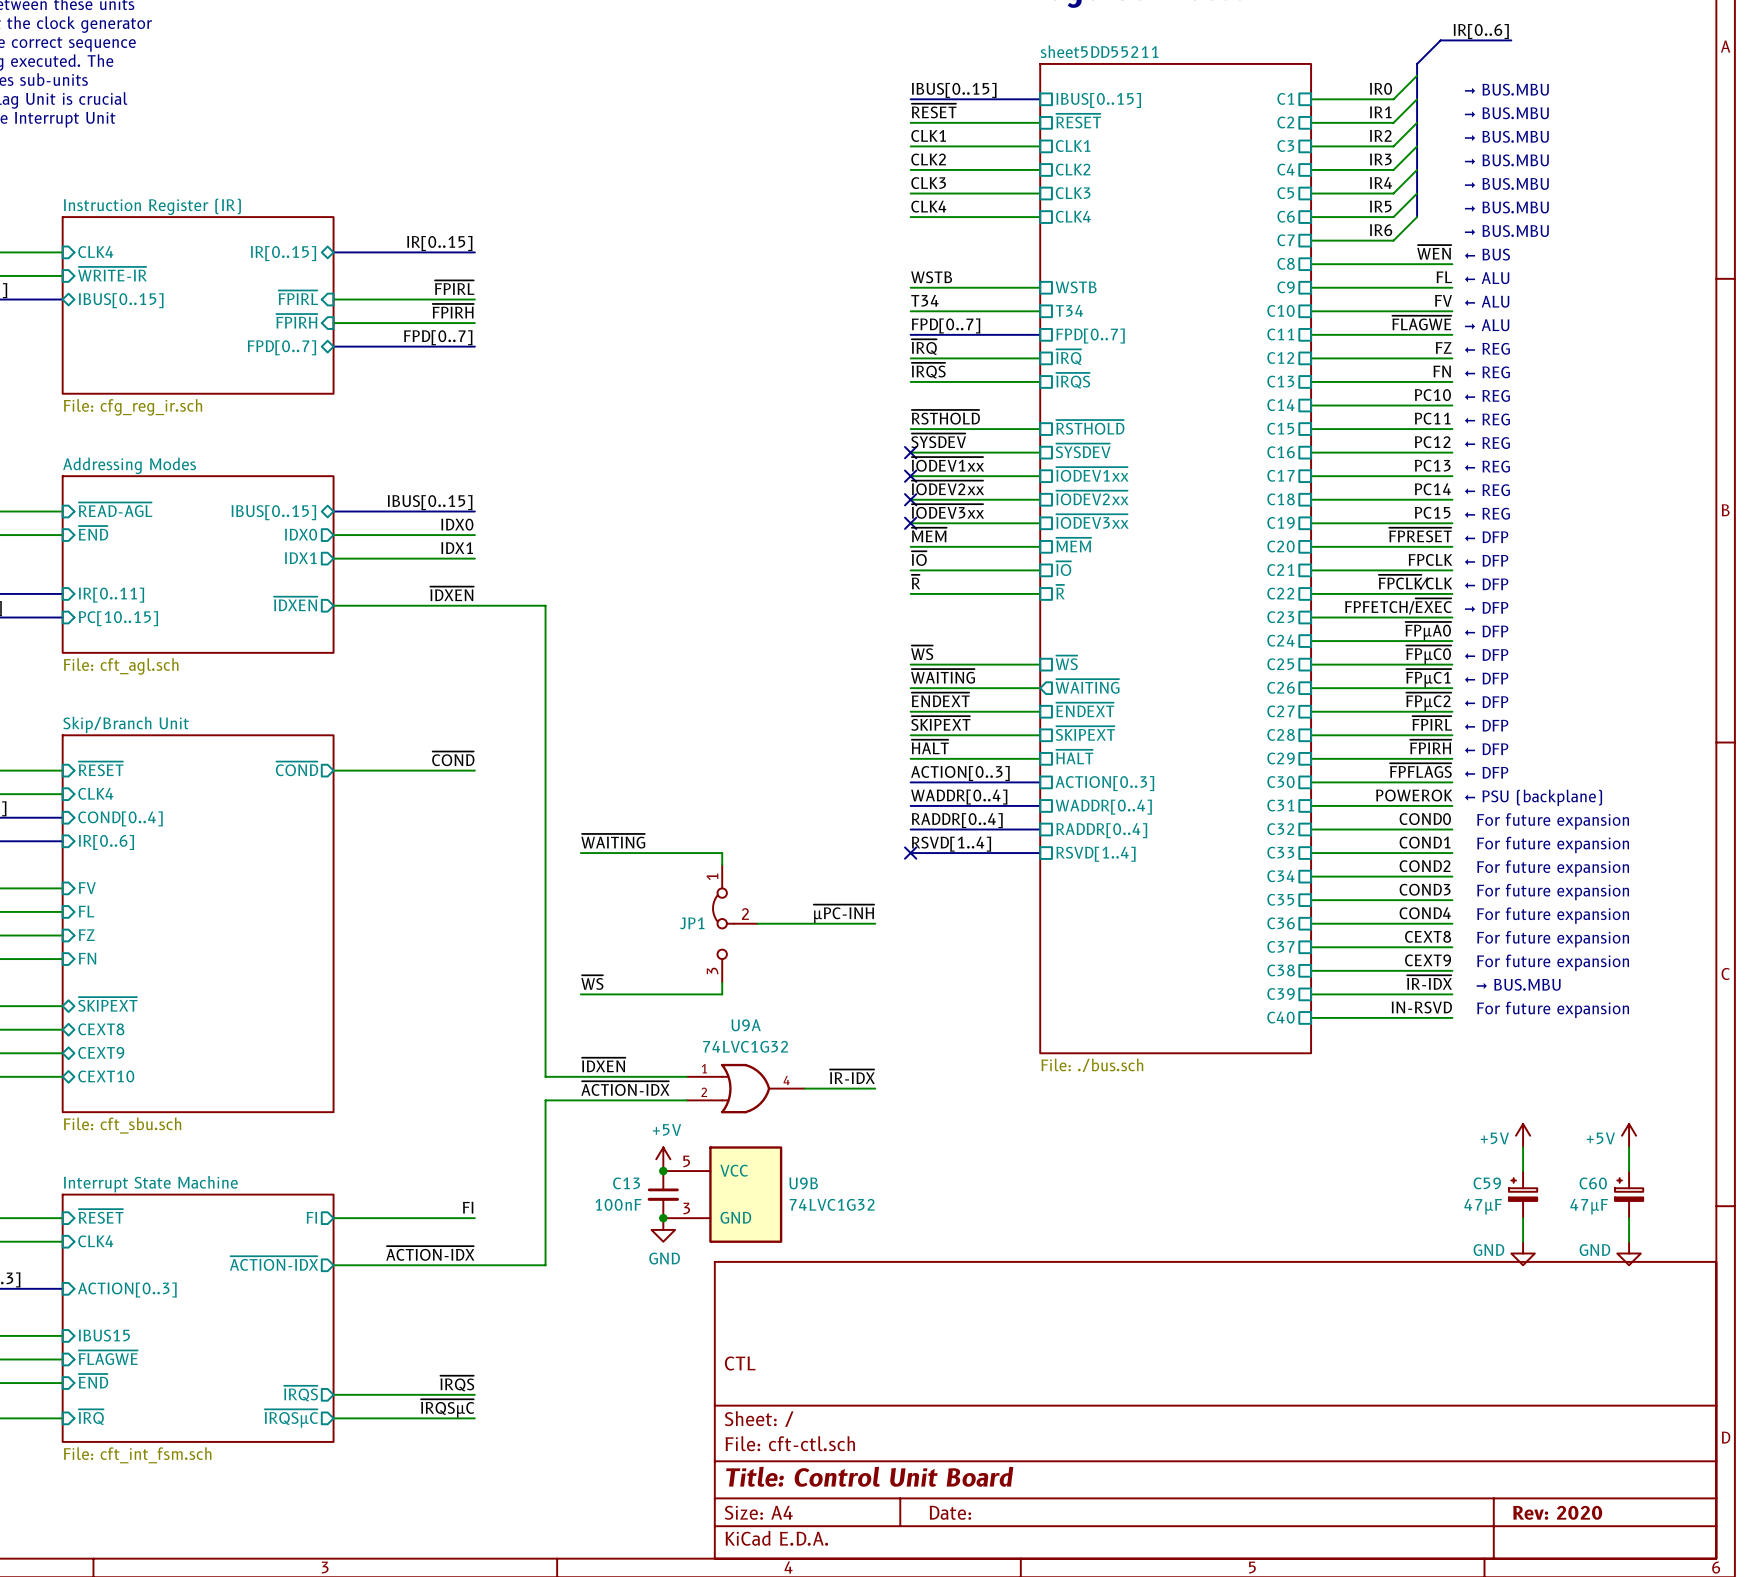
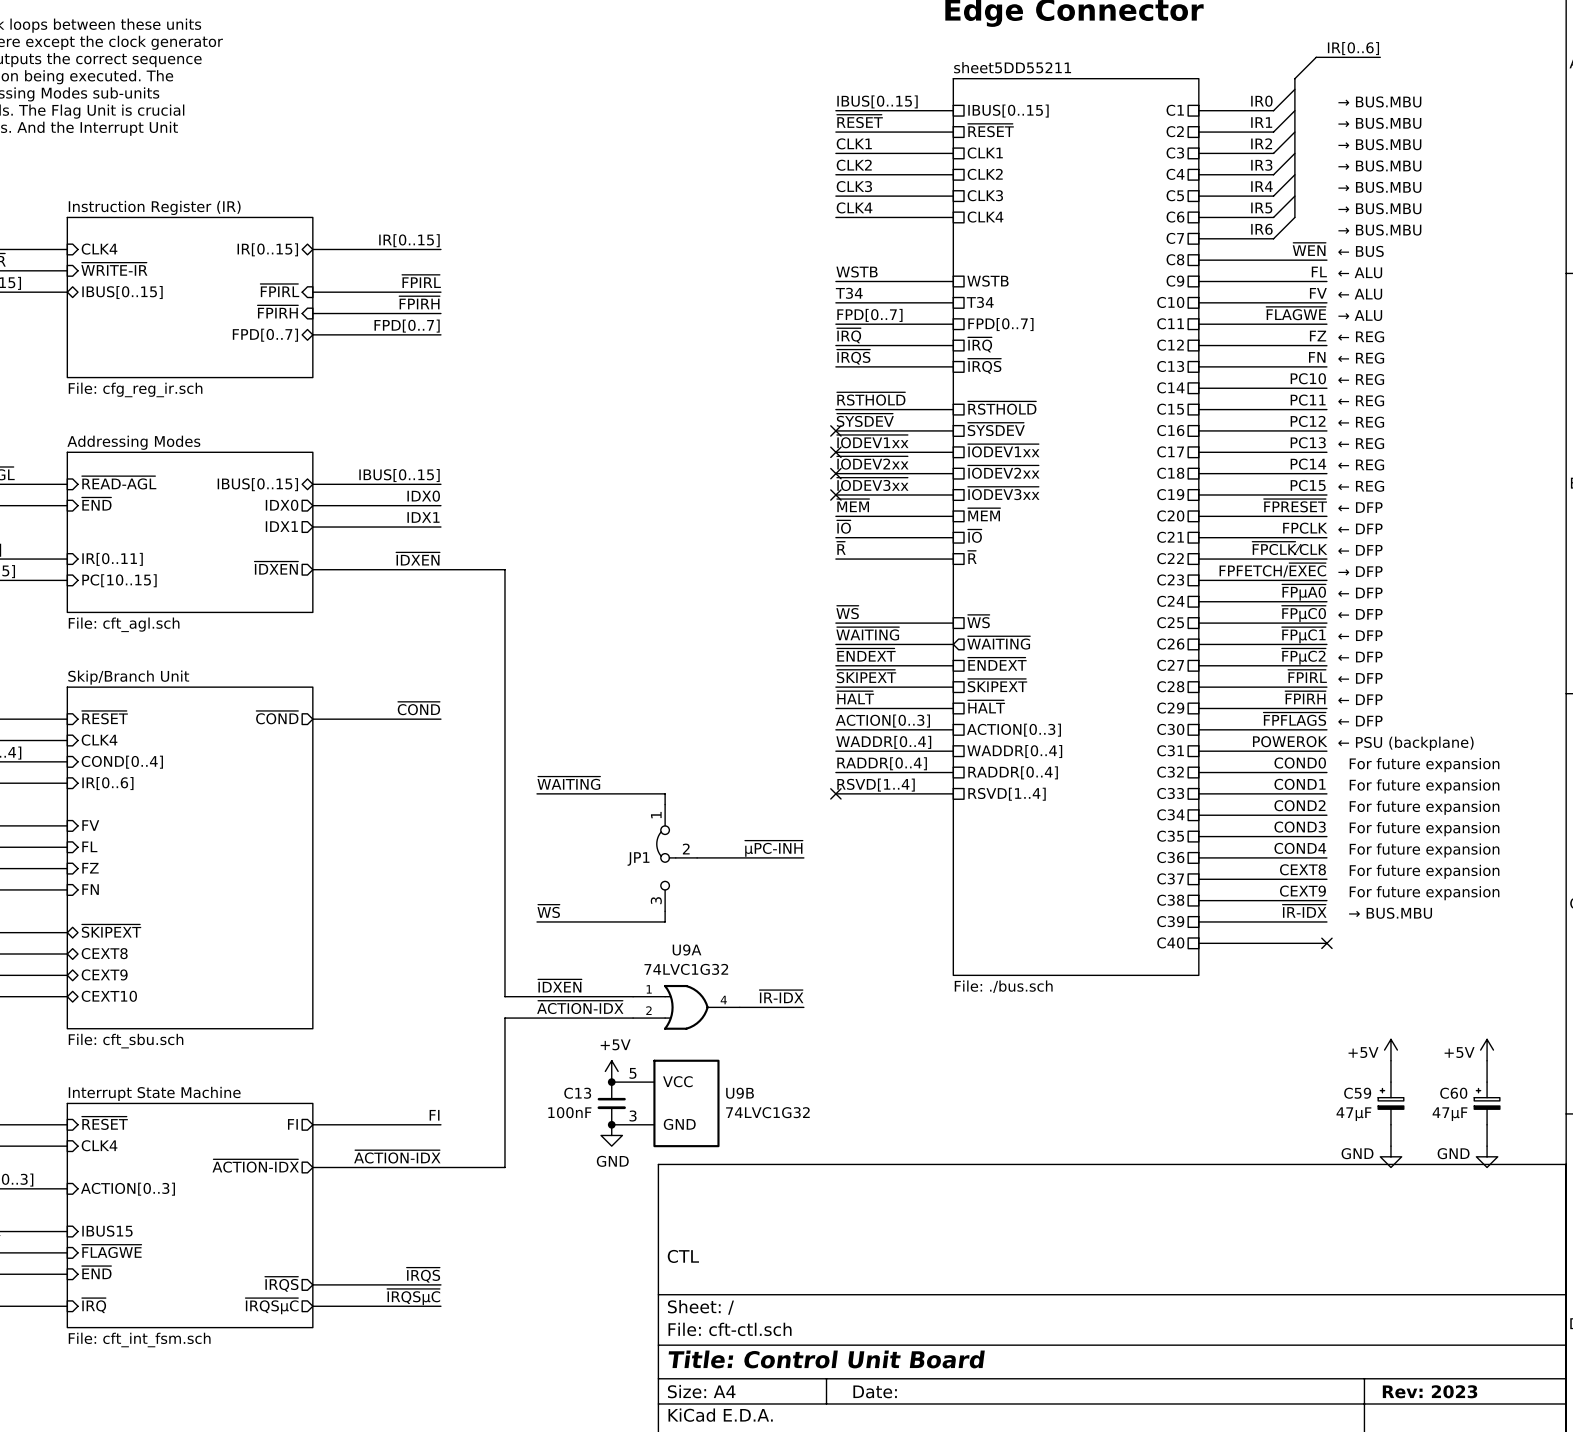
label: IN-RSVD (1421, 1007) -> none
text: For future expansion (1553, 1009) -> none
no-connect mark: none -> (1326, 943)
title block: Rev: 2020 (1557, 1512) -> Rev: 2023 (1430, 1391)

